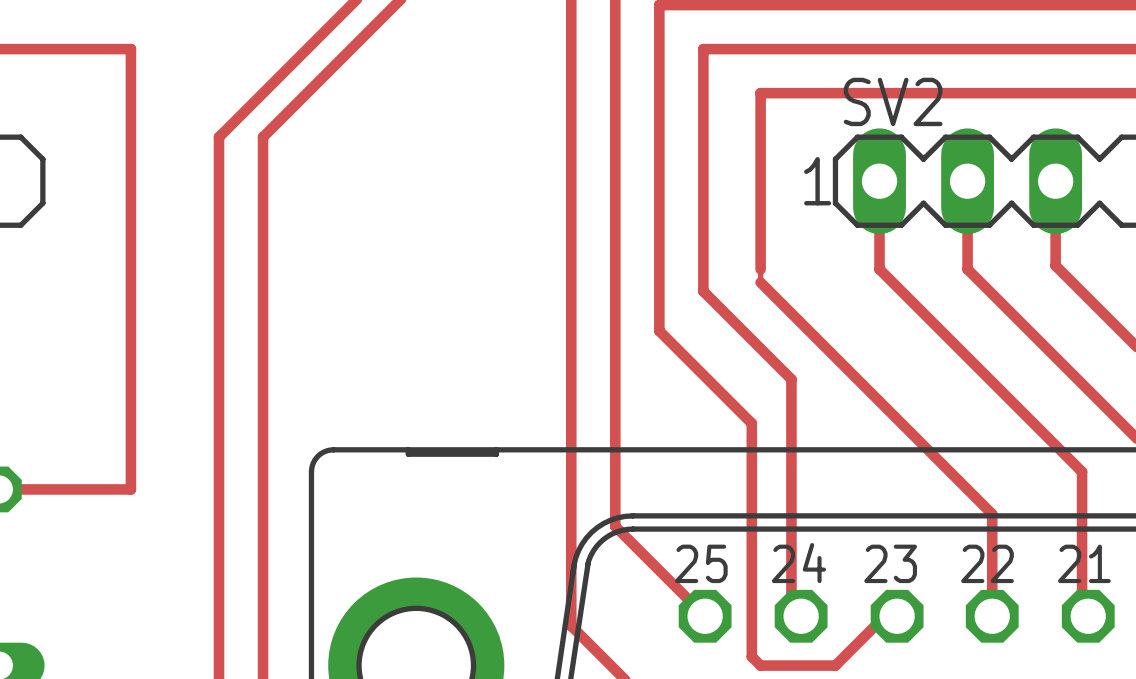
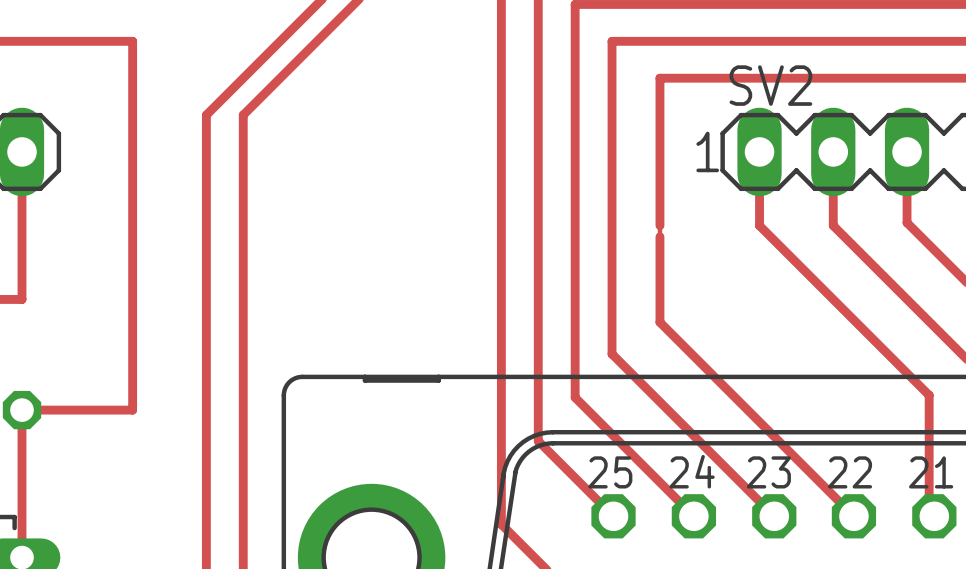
track: (760, 282) (992, 514) (992, 616) -> (659, 236) (659, 322) (853, 516)
track: (703, 291) (791, 379) (791, 606) -> (575, 277) (575, 397) (685, 508)
track: (659, 330) (751, 423) (751, 656) (760, 665) (835, 665) (884, 616) (897, 616) -> (612, 244) (612, 354) (774, 516)

